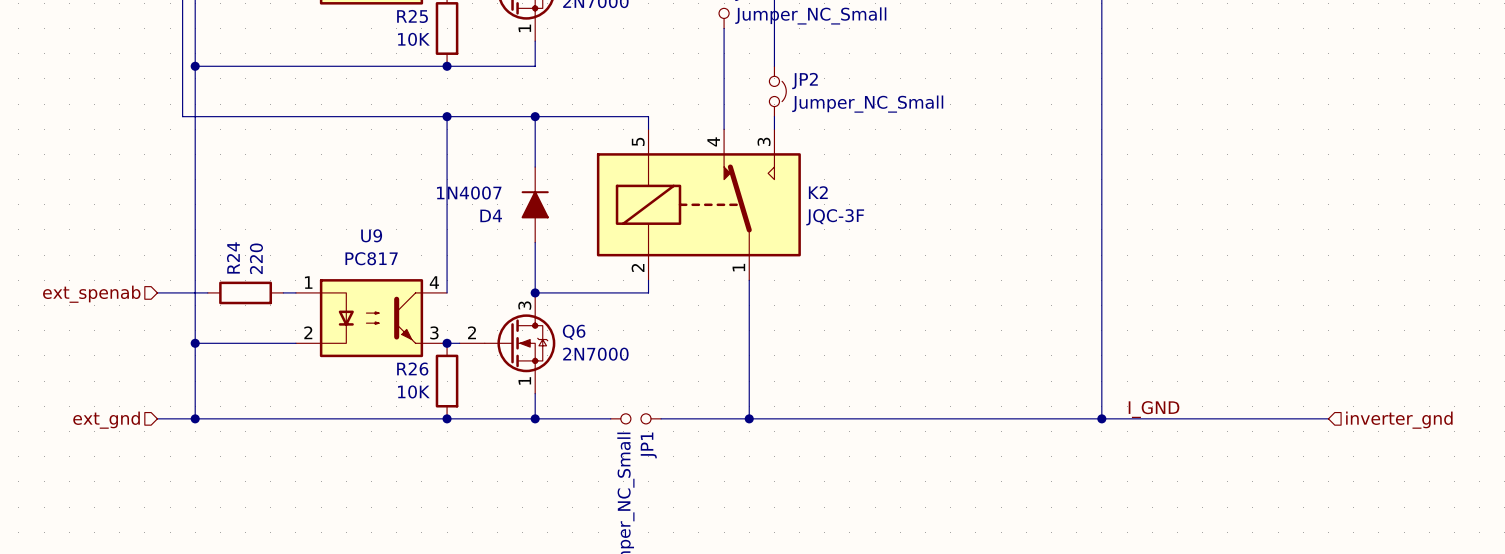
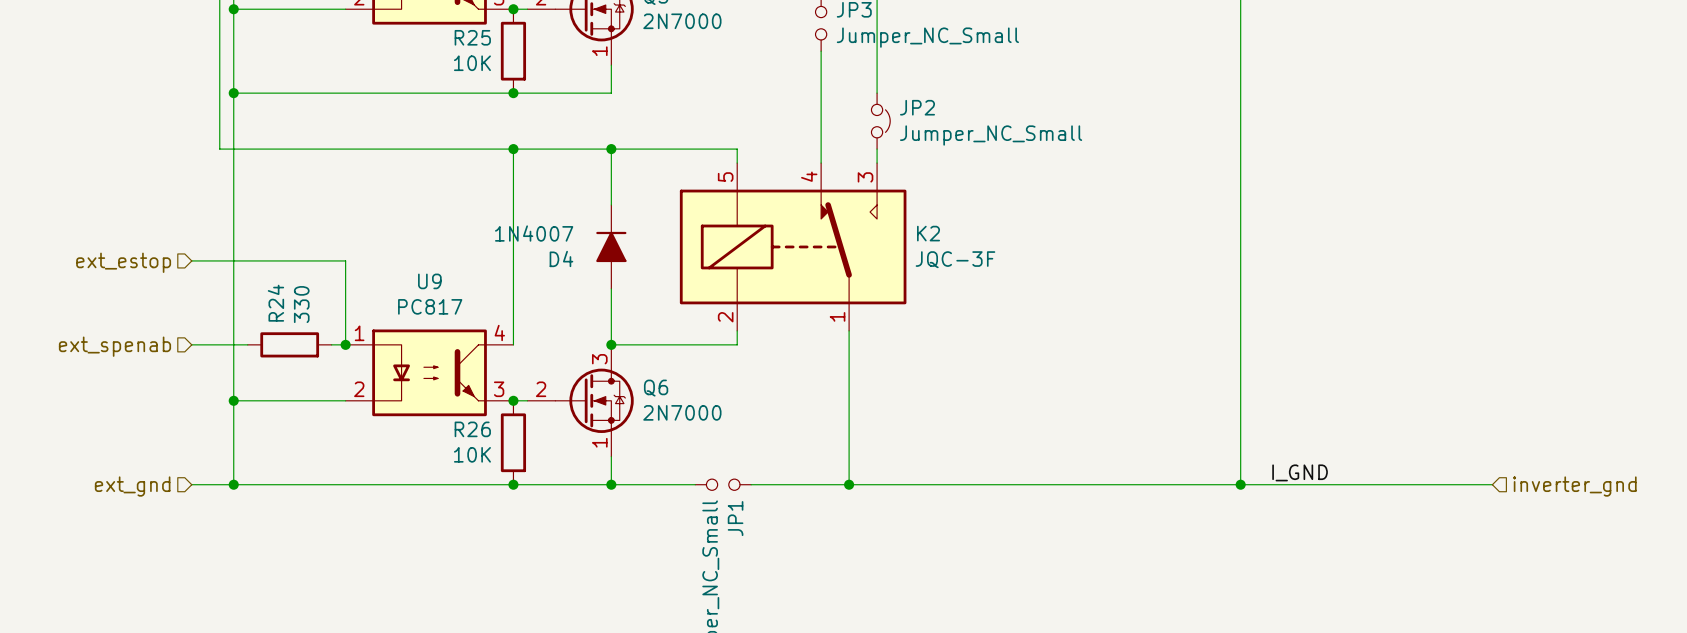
wire: none -> (191, 260) (345, 260) (345, 344)
hierarchical label: none -> ext_estop (123, 262)
R24 value: 220 (256, 258) -> 330 (301, 304)
junction: none -> (345, 344)

